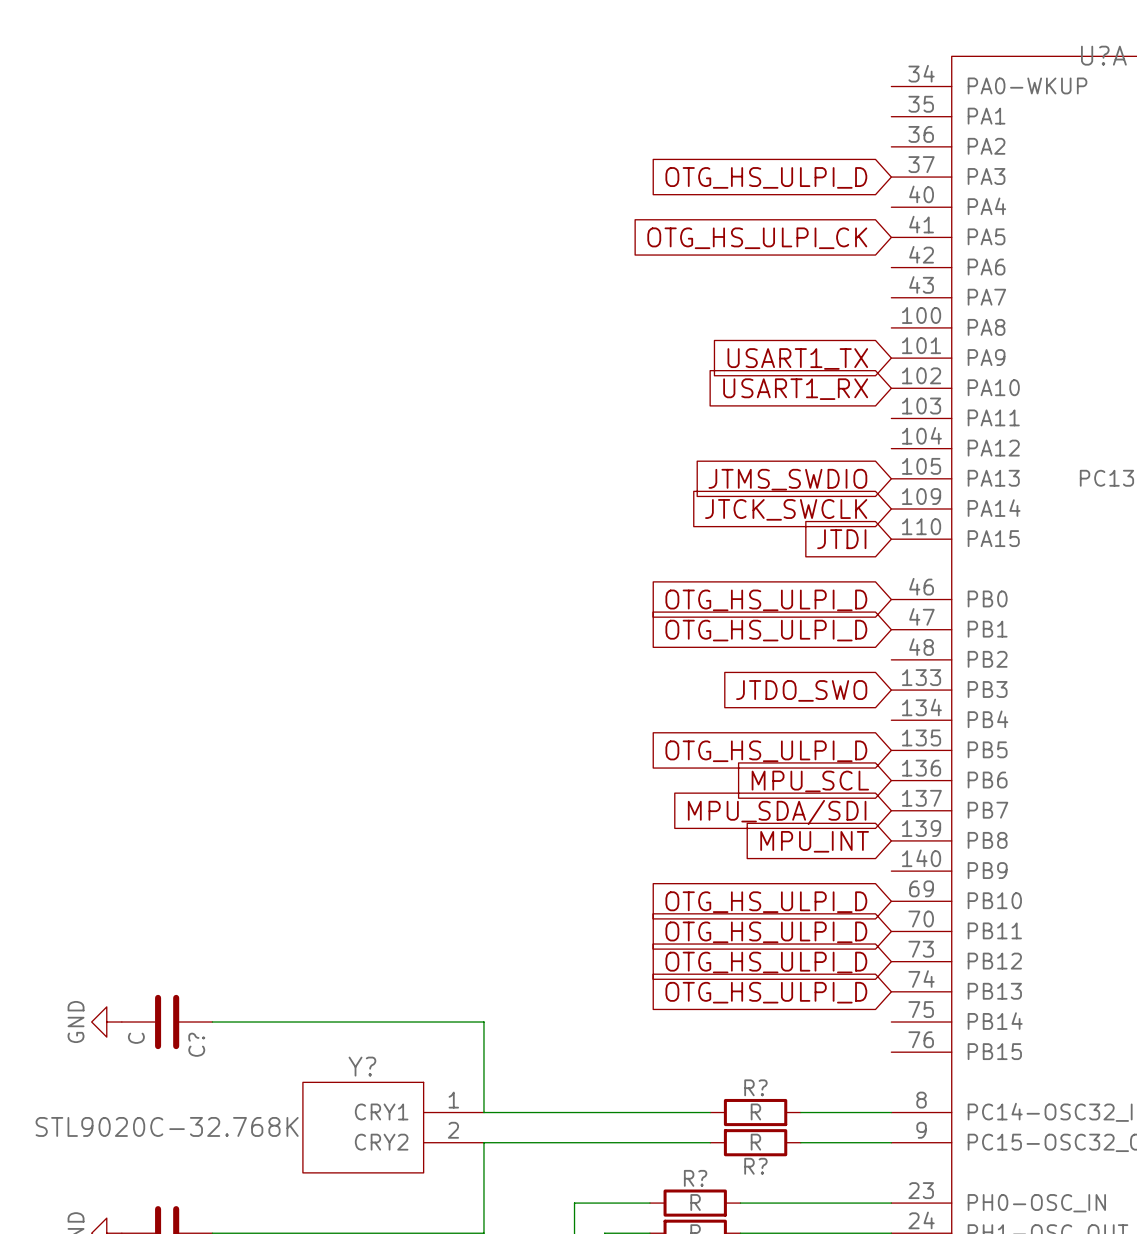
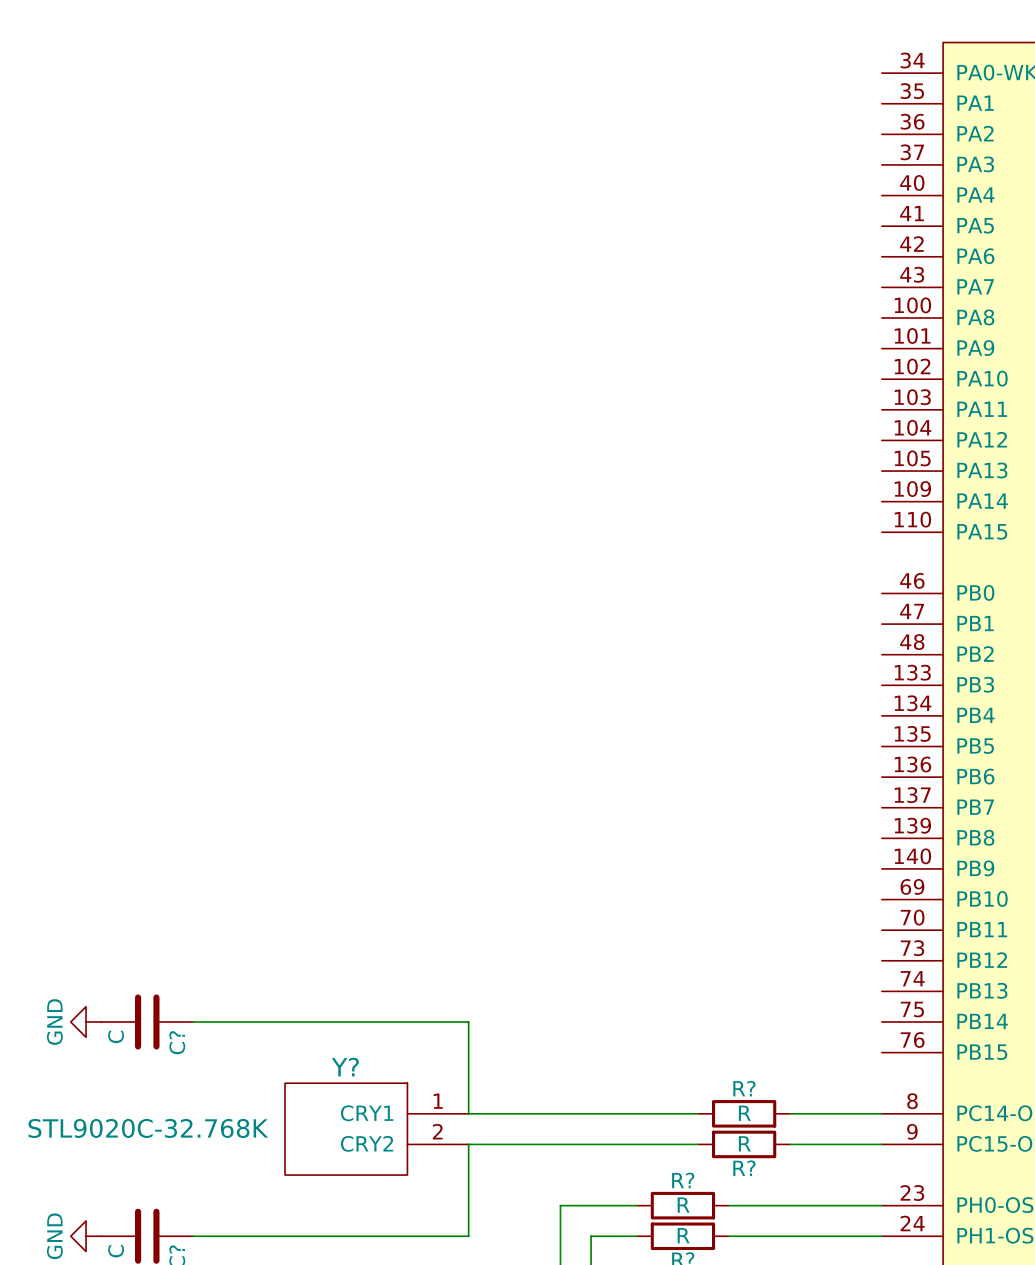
global label: OTG_HS_ULPI_D (766, 177) -> none
global label: OTG_HS_ULPI_CK (757, 238) -> none
global label: USART1_TX (797, 358) -> none
global label: USART1_RX (795, 389) -> none
global label: JTMS_SWDIO (787, 479) -> none
global label: JTCK_SWCLK (786, 509) -> none
global label: JTDI (841, 539) -> none
global label: OTG_HS_ULPI_D (766, 600) -> none
global label: OTG_HS_ULPI_D (766, 630) -> none
global label: JTDO_SWO (801, 690) -> none
global label: OTG_HS_ULPI_D (766, 751) -> none
global label: MPU_SCL (810, 781) -> none
global label: MPU_SDA/SDI (777, 812) -> none
global label: MPU_INT (814, 841) -> none
global label: OTG_HS_ULPI_D (766, 902) -> none
global label: OTG_HS_ULPI_D (766, 932) -> none
global label: OTG_HS_ULPI_D (766, 962) -> none
global label: OTG_HS_ULPI_D (766, 992) -> none

